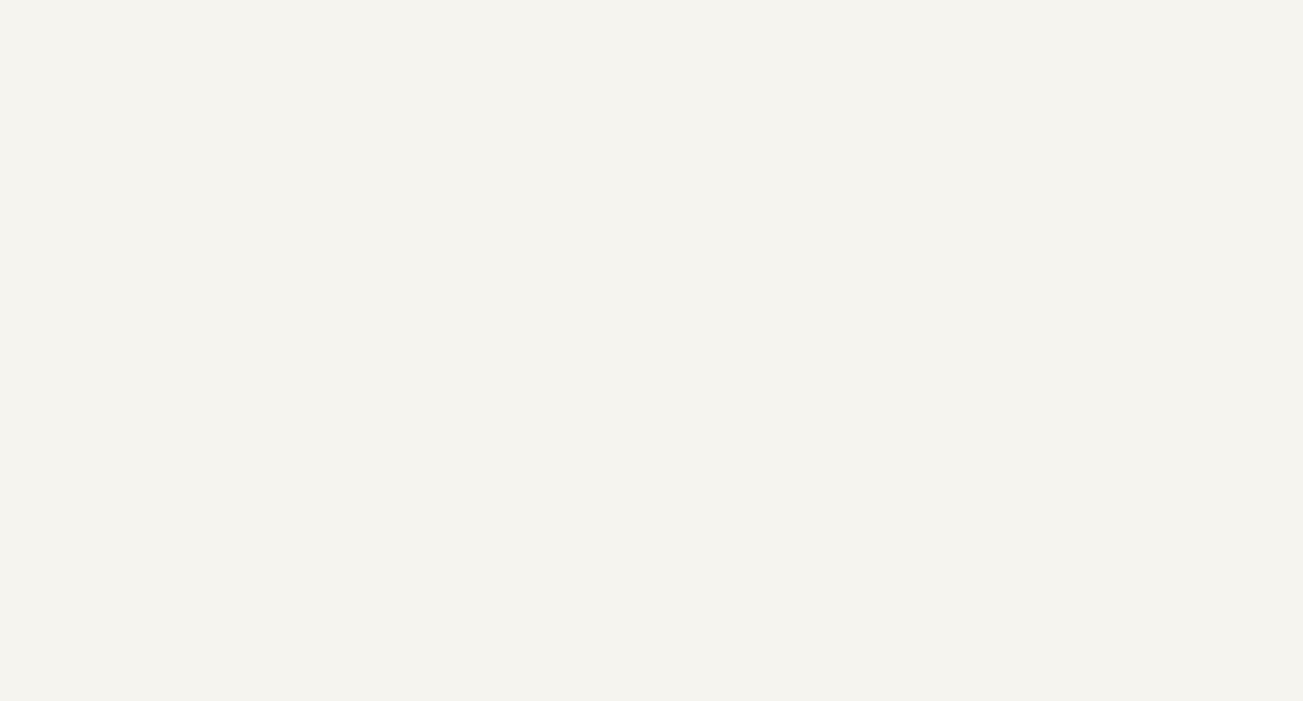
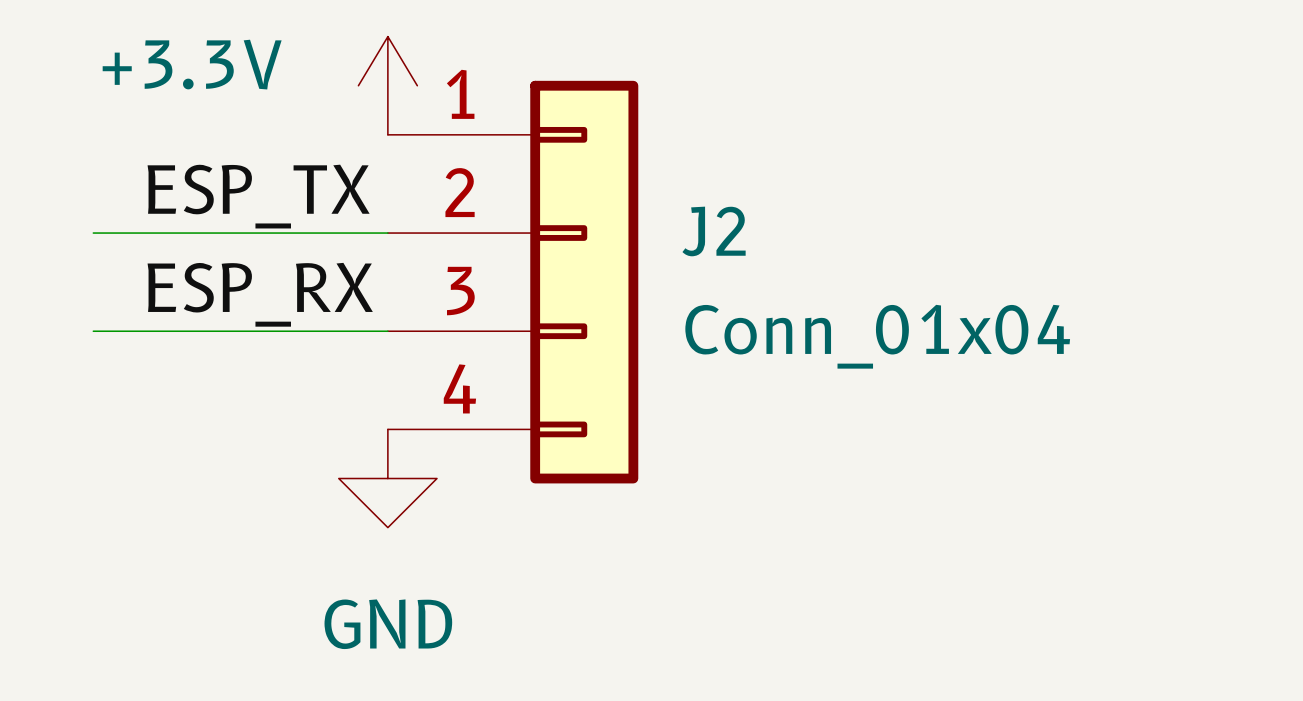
power symbol: none -> +3.3V (387, 85)
label: none -> ESP_TX (258, 196)
wire: none -> (93, 233) (387, 233)
J2: none -> Conn_01x04 (513, 282)
label: none -> ESP_RX (260, 294)
wire: none -> (93, 331) (387, 331)
power symbol: none -> GND (387, 478)

